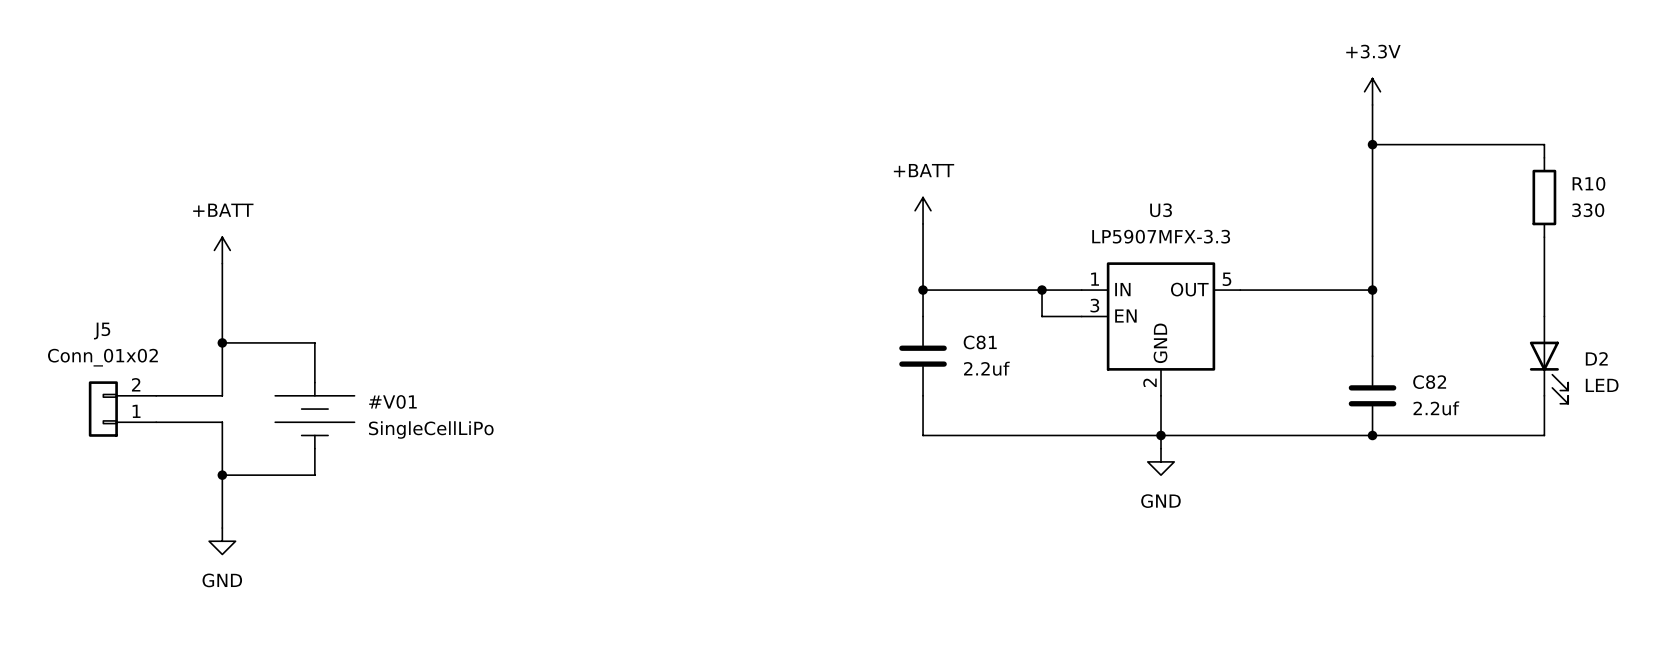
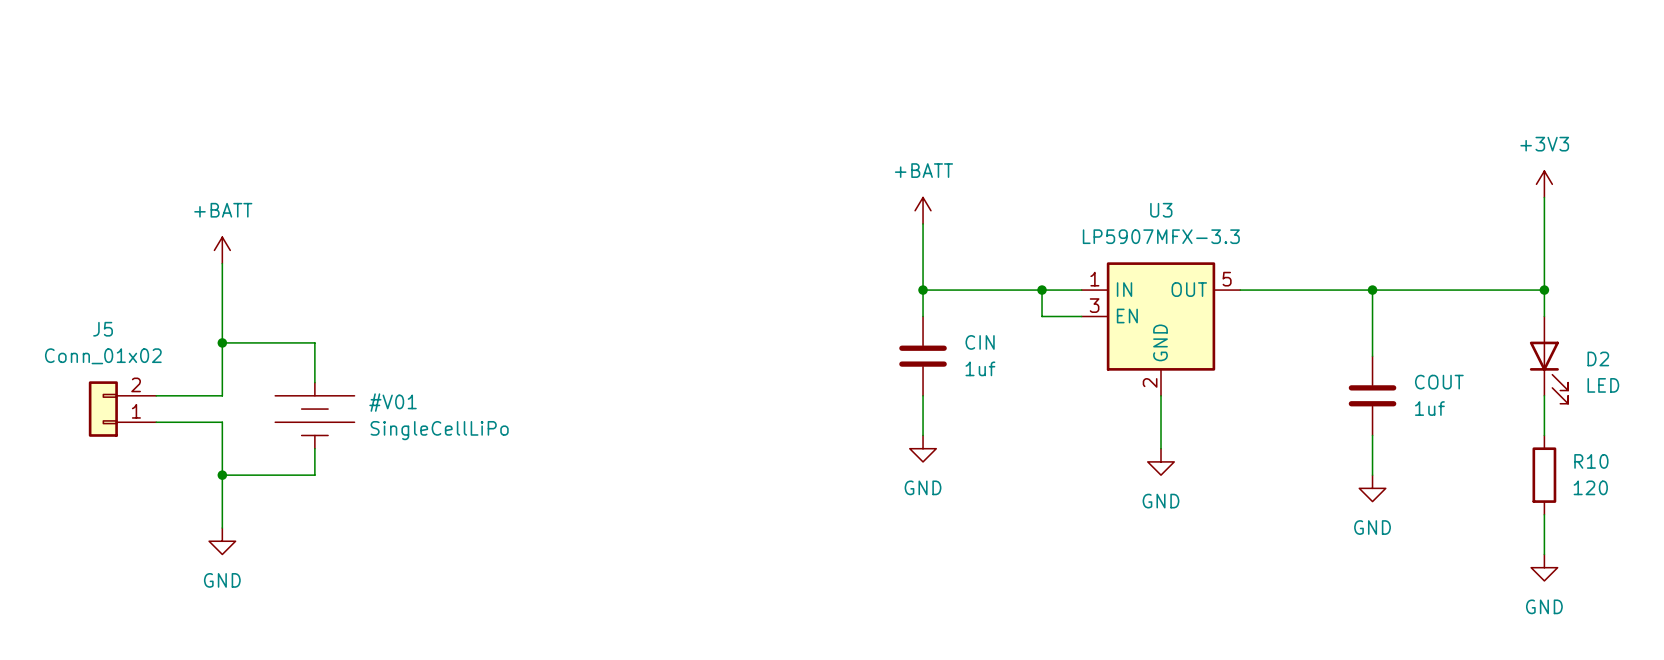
power symbol: +3.3V (1372, 91) -> none
wire: (1372, 104) (1372, 290) -> (1544, 290) (1372, 290)
wire: (1372, 144) (1544, 144) (1544, 157) -> none
junction: (1372, 144) -> none
power symbol: none -> +3V3 (1544, 184)
wire: none -> (1544, 197) (1544, 237)
R10 position: (1544, 197) -> (1544, 475)
R10 value: 330 (1588, 210) -> 120 (1590, 487)
junction: none -> (1544, 290)
C81 name: C81 (980, 342) -> CIN (980, 342)
C81 value: 2.2uf (986, 368) -> 1uf (980, 368)
C82 name: C82 (1429, 382) -> COUT (1439, 382)
C82 value: 2.2uf (1436, 408) -> 1uf (1429, 408)
wire: (923, 435) (1544, 435) -> none
junction: (1161, 435) -> none
wire: none -> (1372, 435) (1372, 475)
junction: (1372, 435) -> none
power symbol: none -> GND (923, 448)
power symbol: none -> GND (1372, 488)
wire: none -> (1544, 514) (1544, 554)
power symbol: none -> GND (1544, 567)

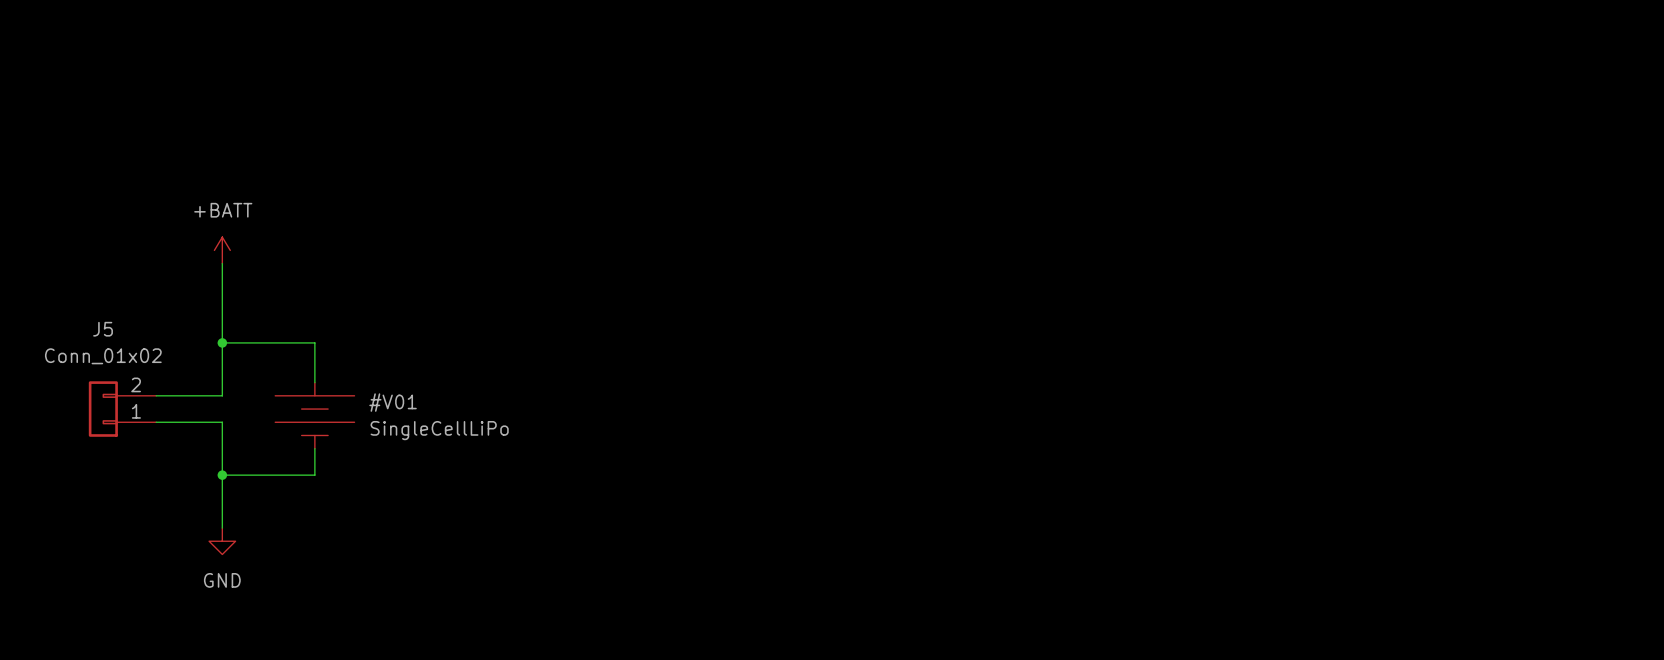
power symbol: +3V3 (1544, 184) -> none
wire: (1544, 197) (1544, 316) -> none
power symbol: +BATT (923, 210) -> none
wire: (923, 223) (923, 316) -> none
wire: (923, 290) (1081, 290) -> none
junction: (923, 290) -> none
wire: (1042, 290) (1042, 316) (1081, 316) -> none
junction: (1042, 290) -> none
wire: (1240, 290) (1544, 290) -> none
wire: (1372, 290) (1372, 356) -> none
junction: (1372, 290) -> none
junction: (1544, 290) -> none
U3: LP5907MFX-3.3 (1161, 329) -> none
CIN: 1uf (923, 356) -> none
D2: LED (1549, 360) -> none
wire: (923, 395) (923, 435) -> none
wire: (1161, 395) (1161, 448) -> none
COUT: 1uf (1372, 395) -> none
wire: (1544, 395) (1544, 435) -> none
wire: (1372, 435) (1372, 475) -> none
power symbol: GND (923, 448) -> none
power symbol: GND (1161, 461) -> none
R10: 120 (1544, 475) -> none
power symbol: GND (1372, 488) -> none
wire: (1544, 514) (1544, 554) -> none
power symbol: GND (1544, 567) -> none

